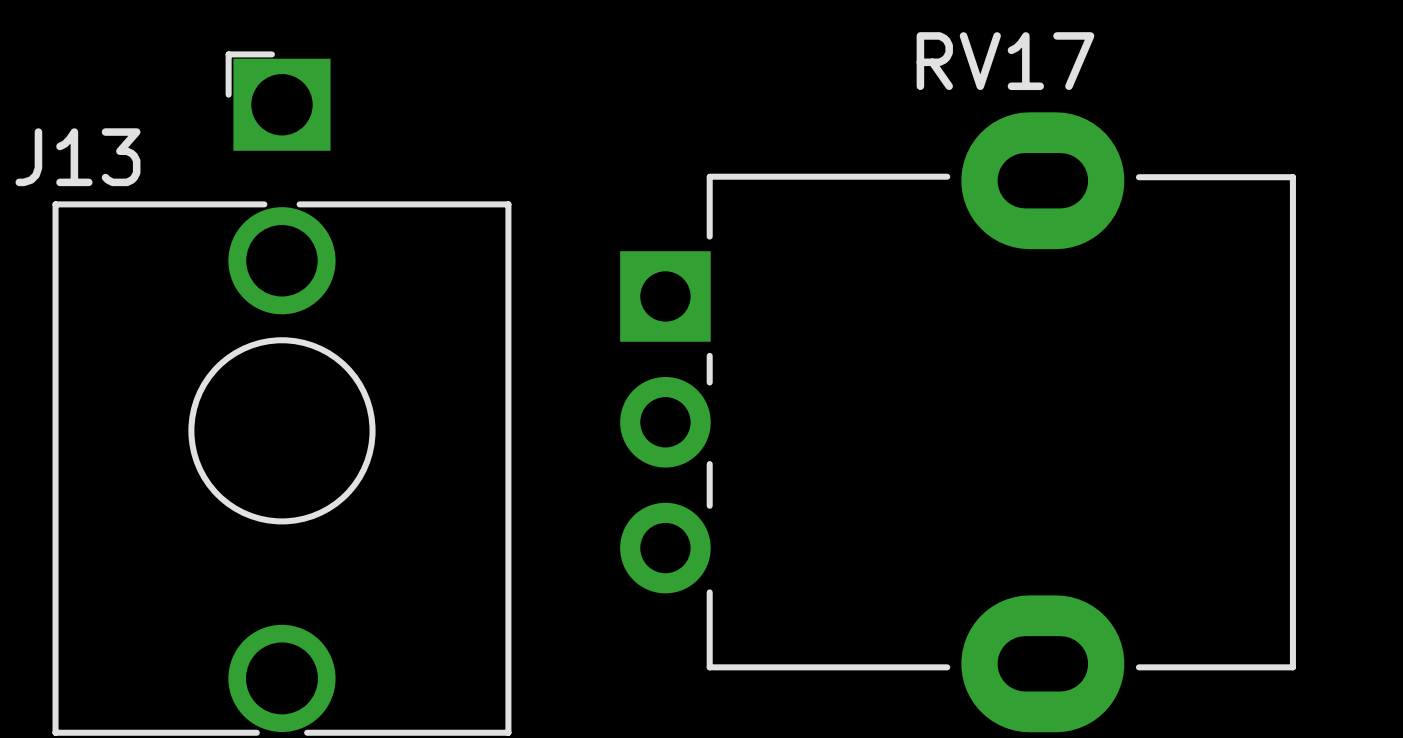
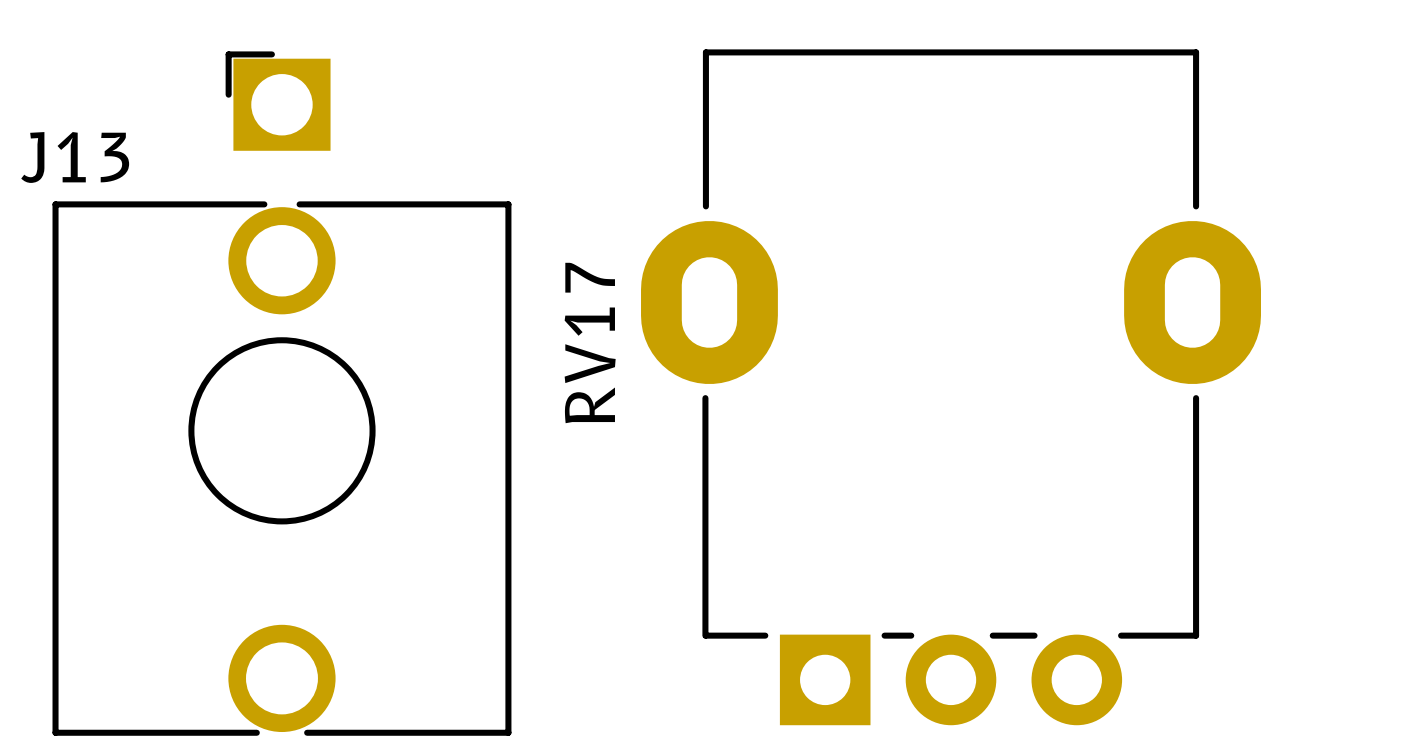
RV17 rotation: 0° (958, 422) -> 90° counterclockwise (951, 387)

